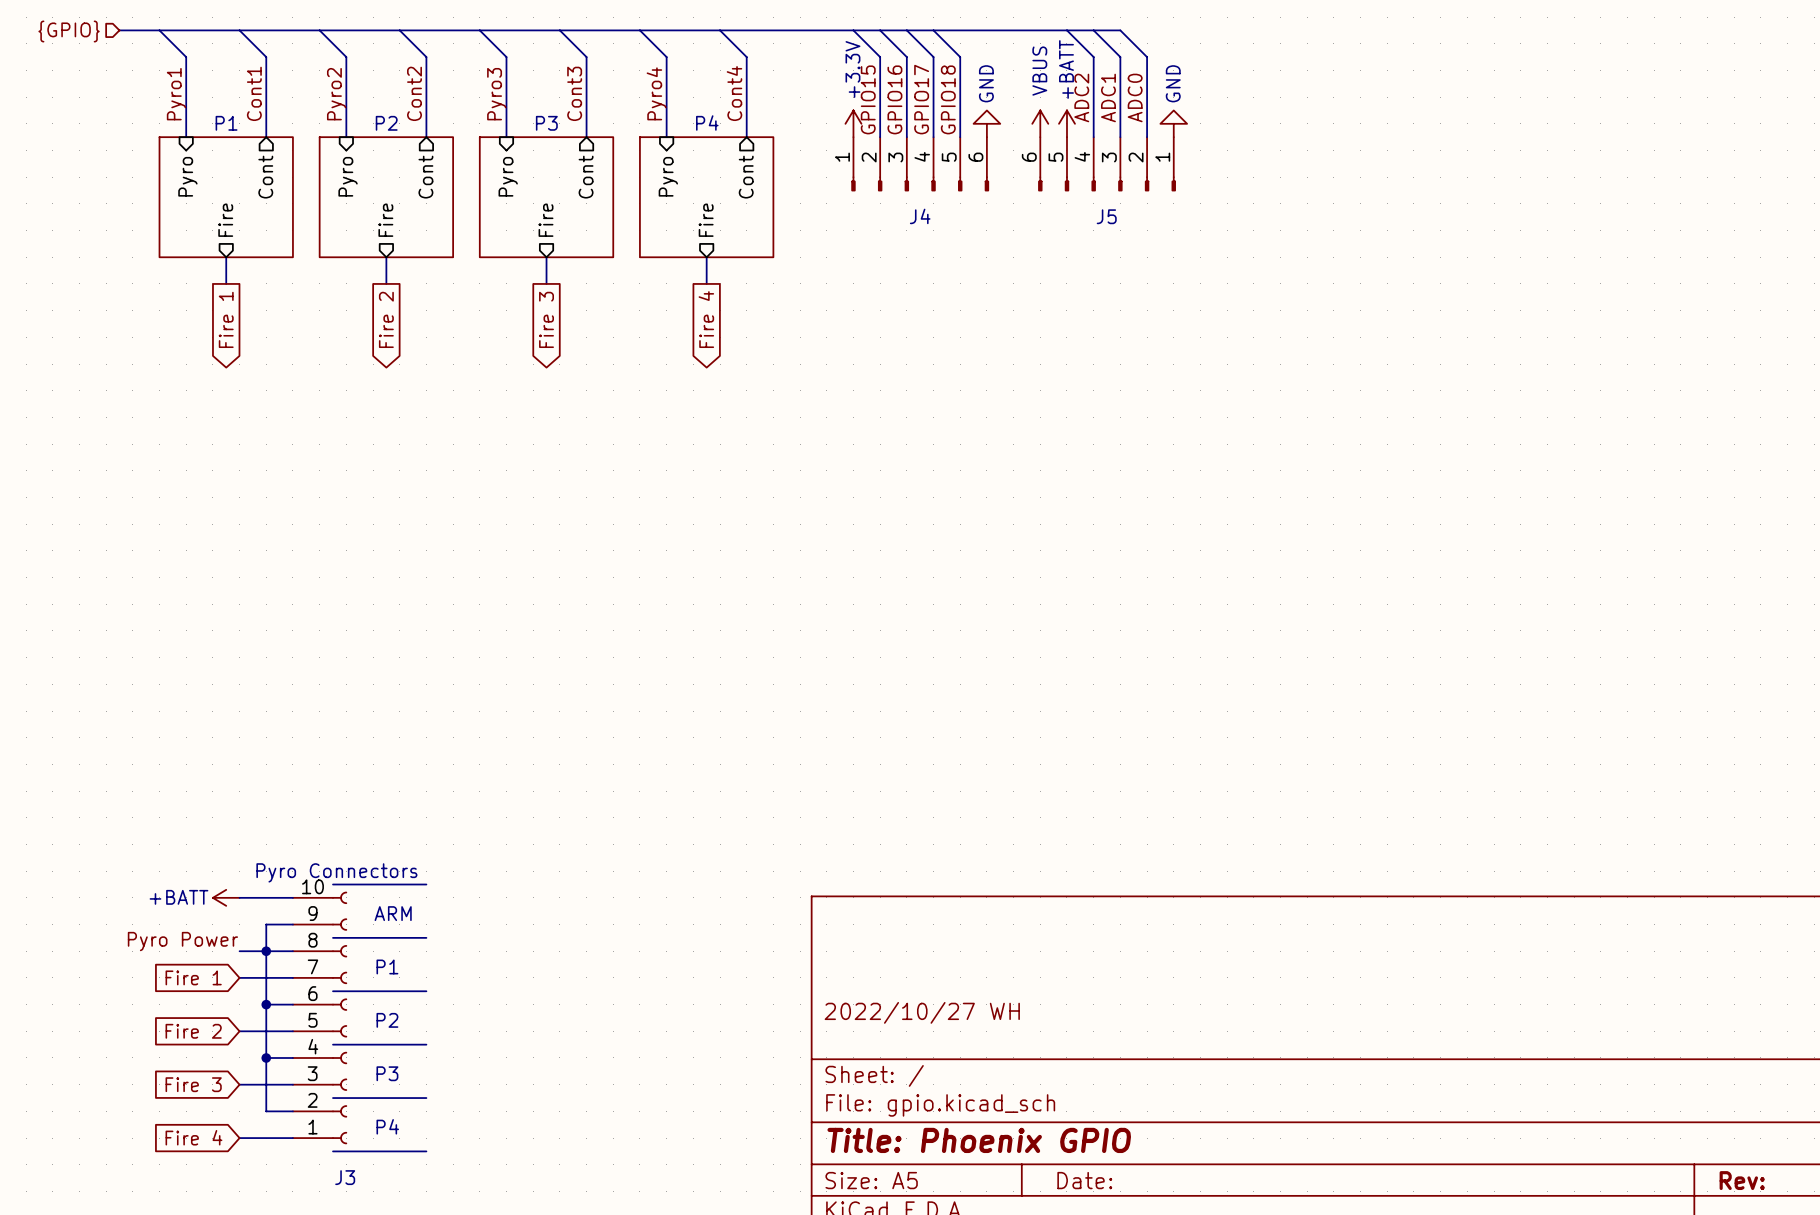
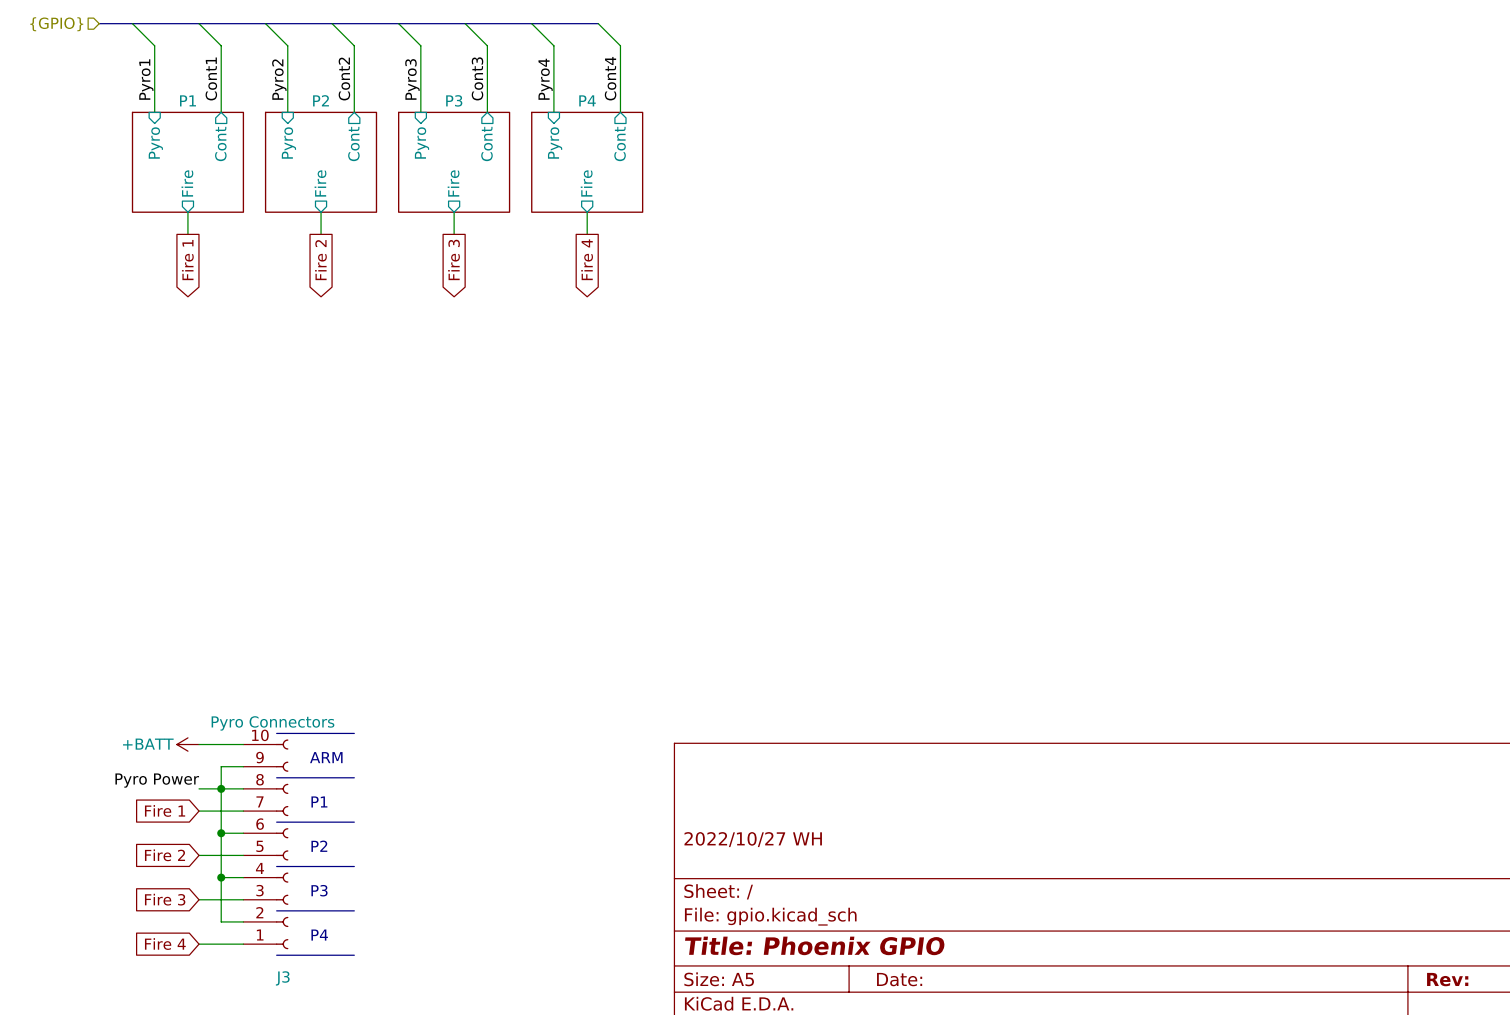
bus: (720, 30) (1120, 30) -> none
wire: (853, 30) (880, 57) (880, 137) -> none
wire: (880, 30) (906, 57) (906, 137) -> none
wire: (906, 30) (933, 57) (933, 137) -> none
wire: (933, 30) (960, 57) (960, 137) -> none
wire: (1066, 30) (1093, 57) (1093, 137) -> none
wire: (1093, 30) (1120, 57) (1120, 137) -> none
wire: (1120, 30) (1147, 57) (1147, 137) -> none
label: ADC2 (1081, 97) -> none
label: ADC1 (1108, 97) -> none
label: ADC0 (1135, 97) -> none
label: GPIO15 (868, 99) -> none
label: GPIO16 (894, 99) -> none
label: GPIO17 (921, 99) -> none
label: GPIO18 (948, 99) -> none
power symbol: +3.3V (853, 123) -> none
power symbol: GND (986, 123) -> none
power symbol: VBUS (1040, 123) -> none
power symbol: +BATT (1066, 123) -> none
power symbol: GND (1173, 123) -> none
J4: (920, 164) -> none
J5: (1107, 164) -> none

